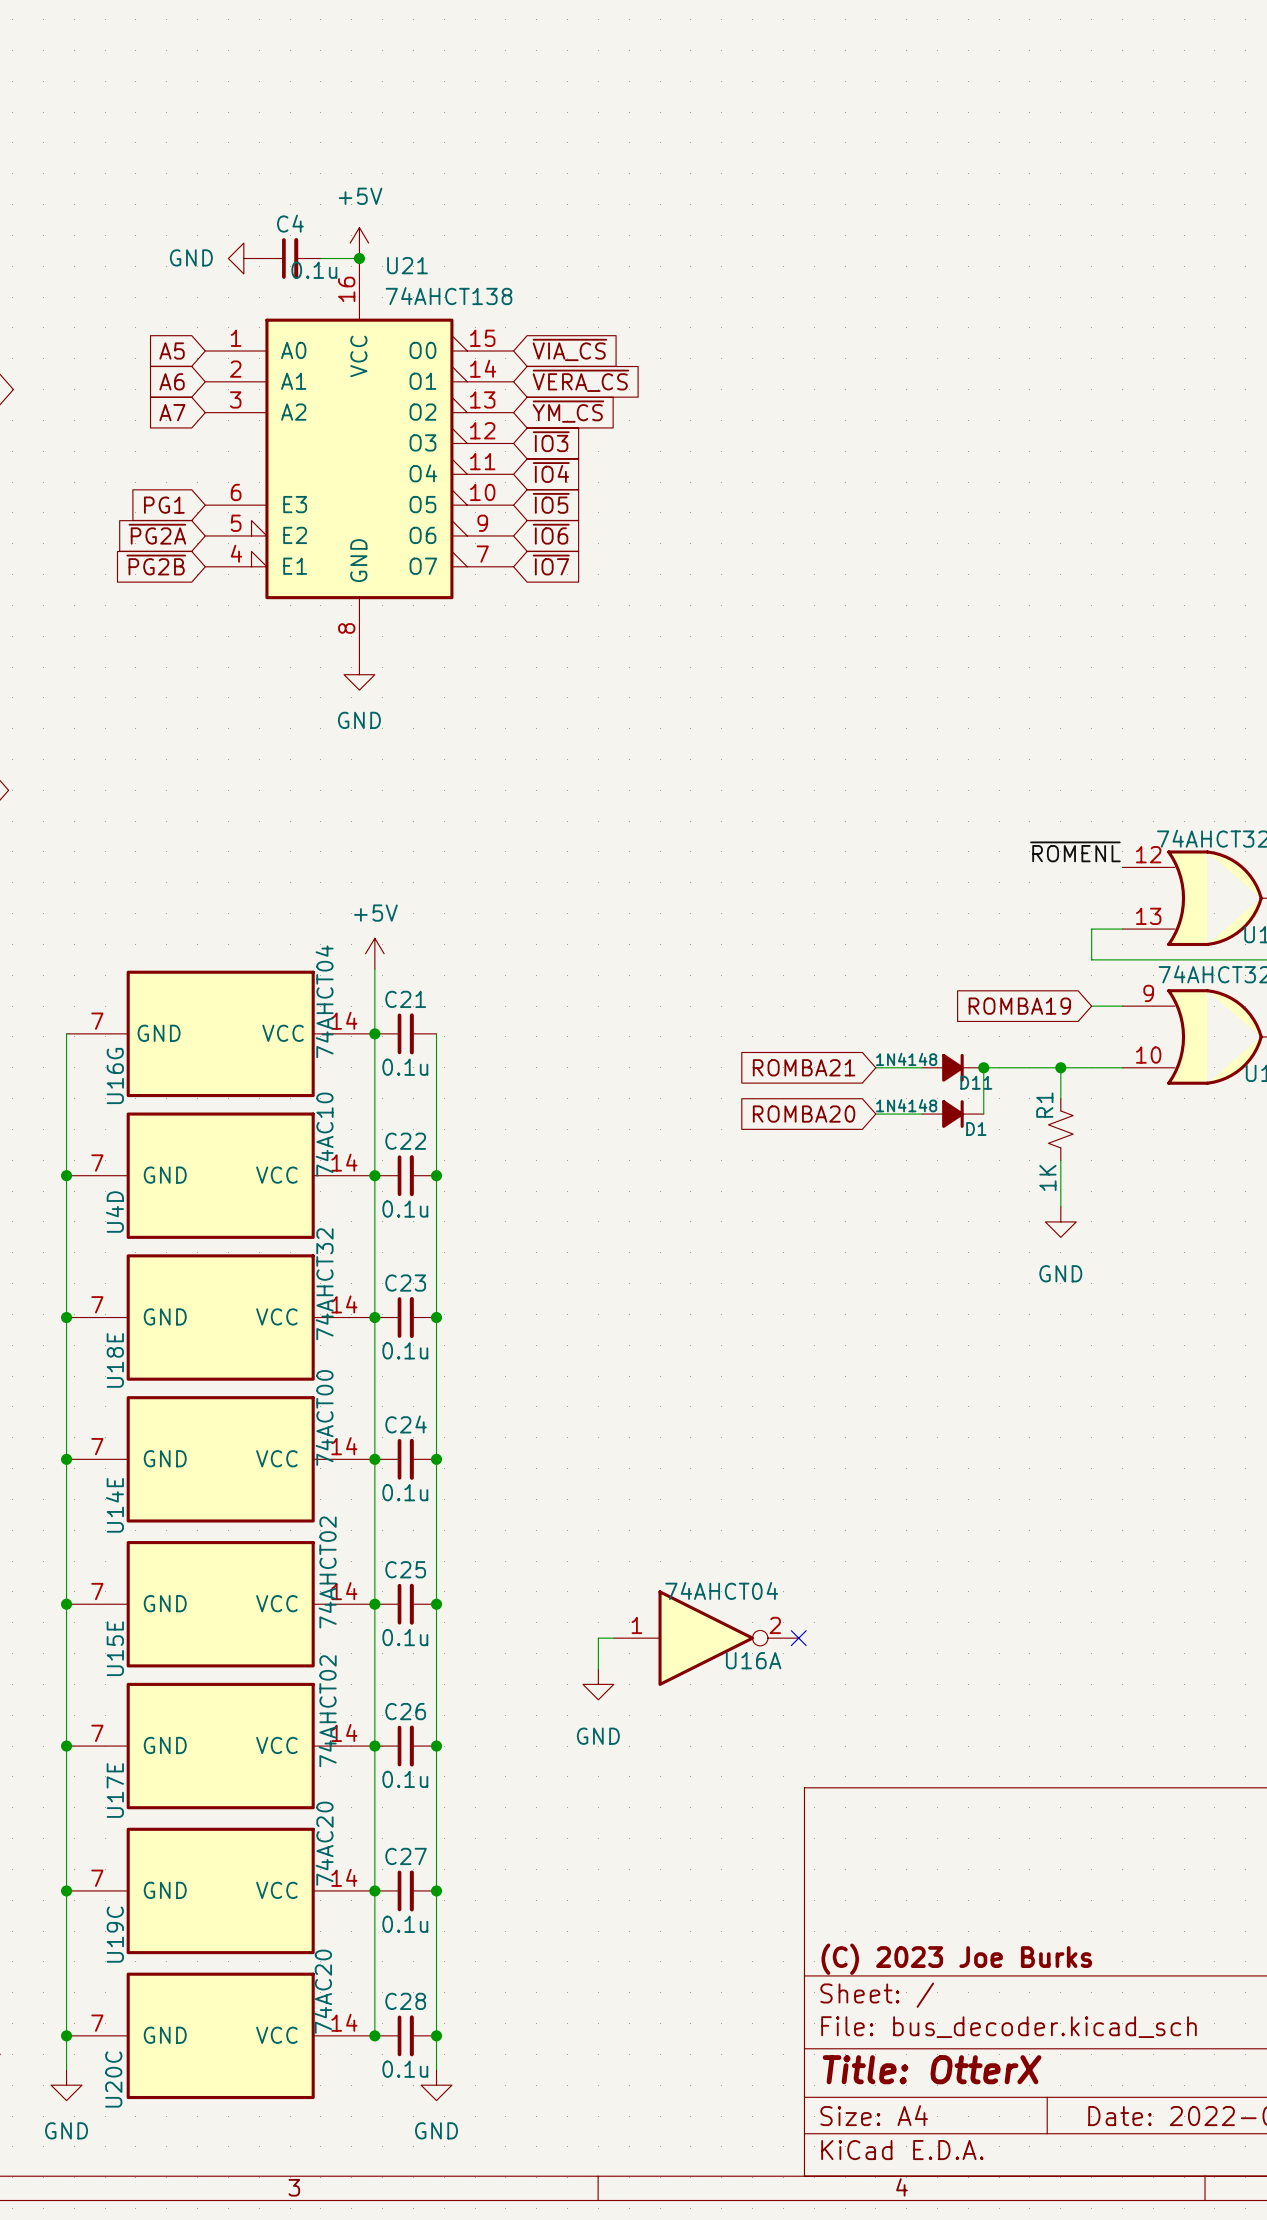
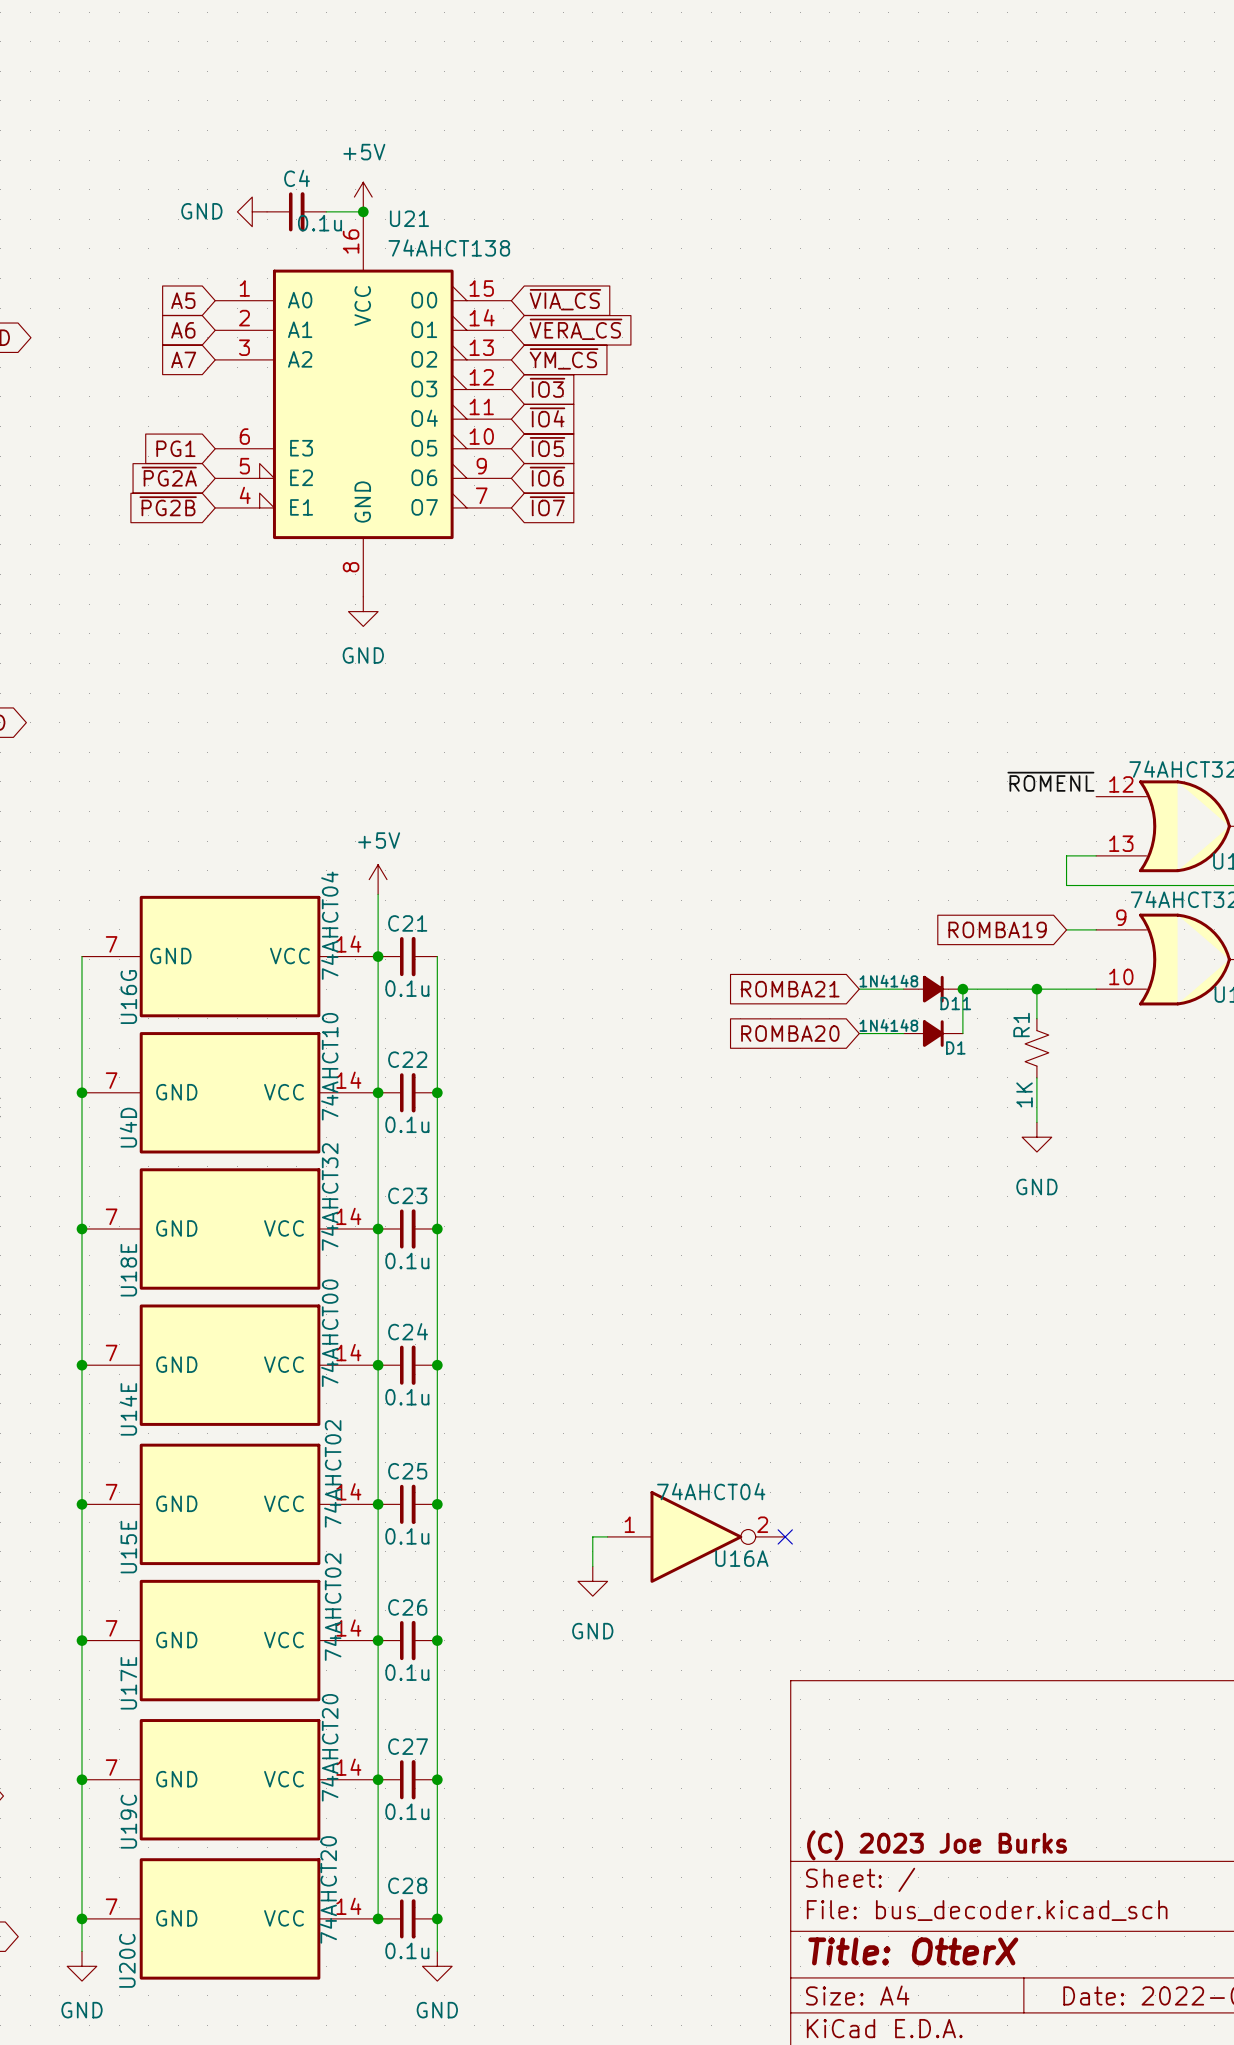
U4D value: 74AC10 (324, 1134) -> 74AHCT10 (329, 1066)
U14E value: 74ACT00 (324, 1417) -> 74AHCT00 (329, 1333)
U19C value: 74AC20 (324, 1843) -> 74AHCT20 (329, 1747)
U20C value: 74AC20 (323, 1991) -> 74AHCT20 (328, 1889)

